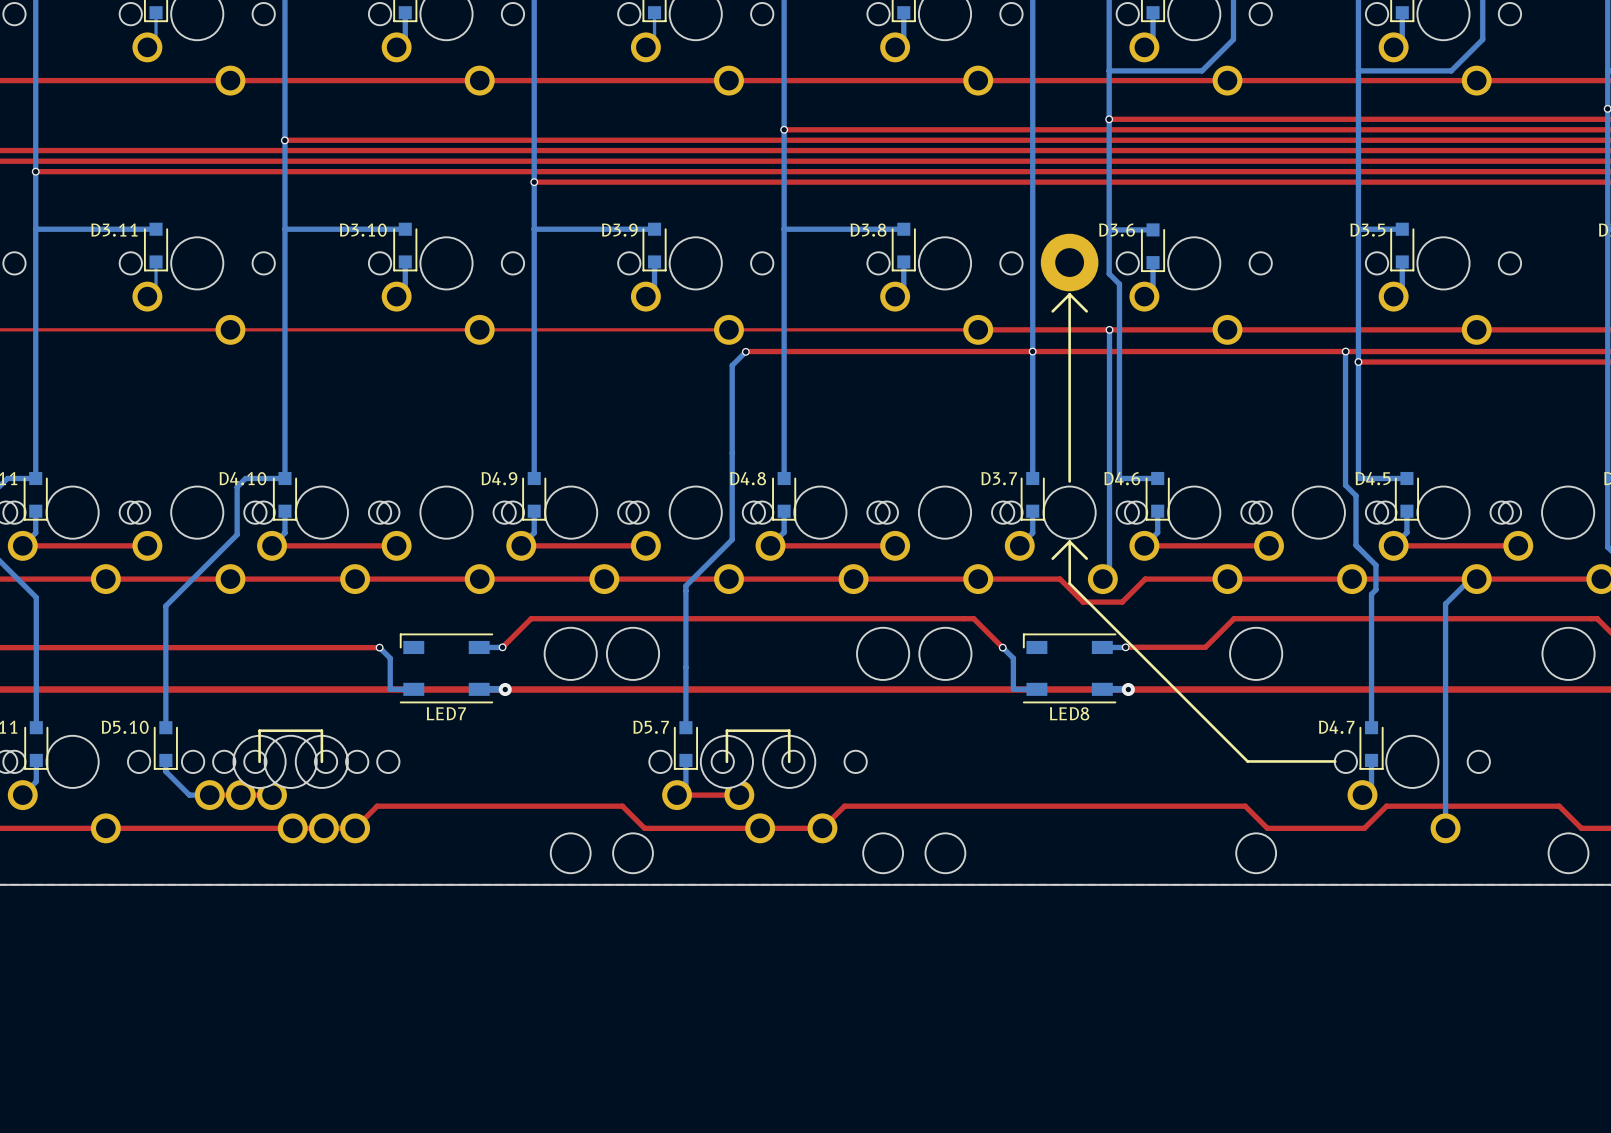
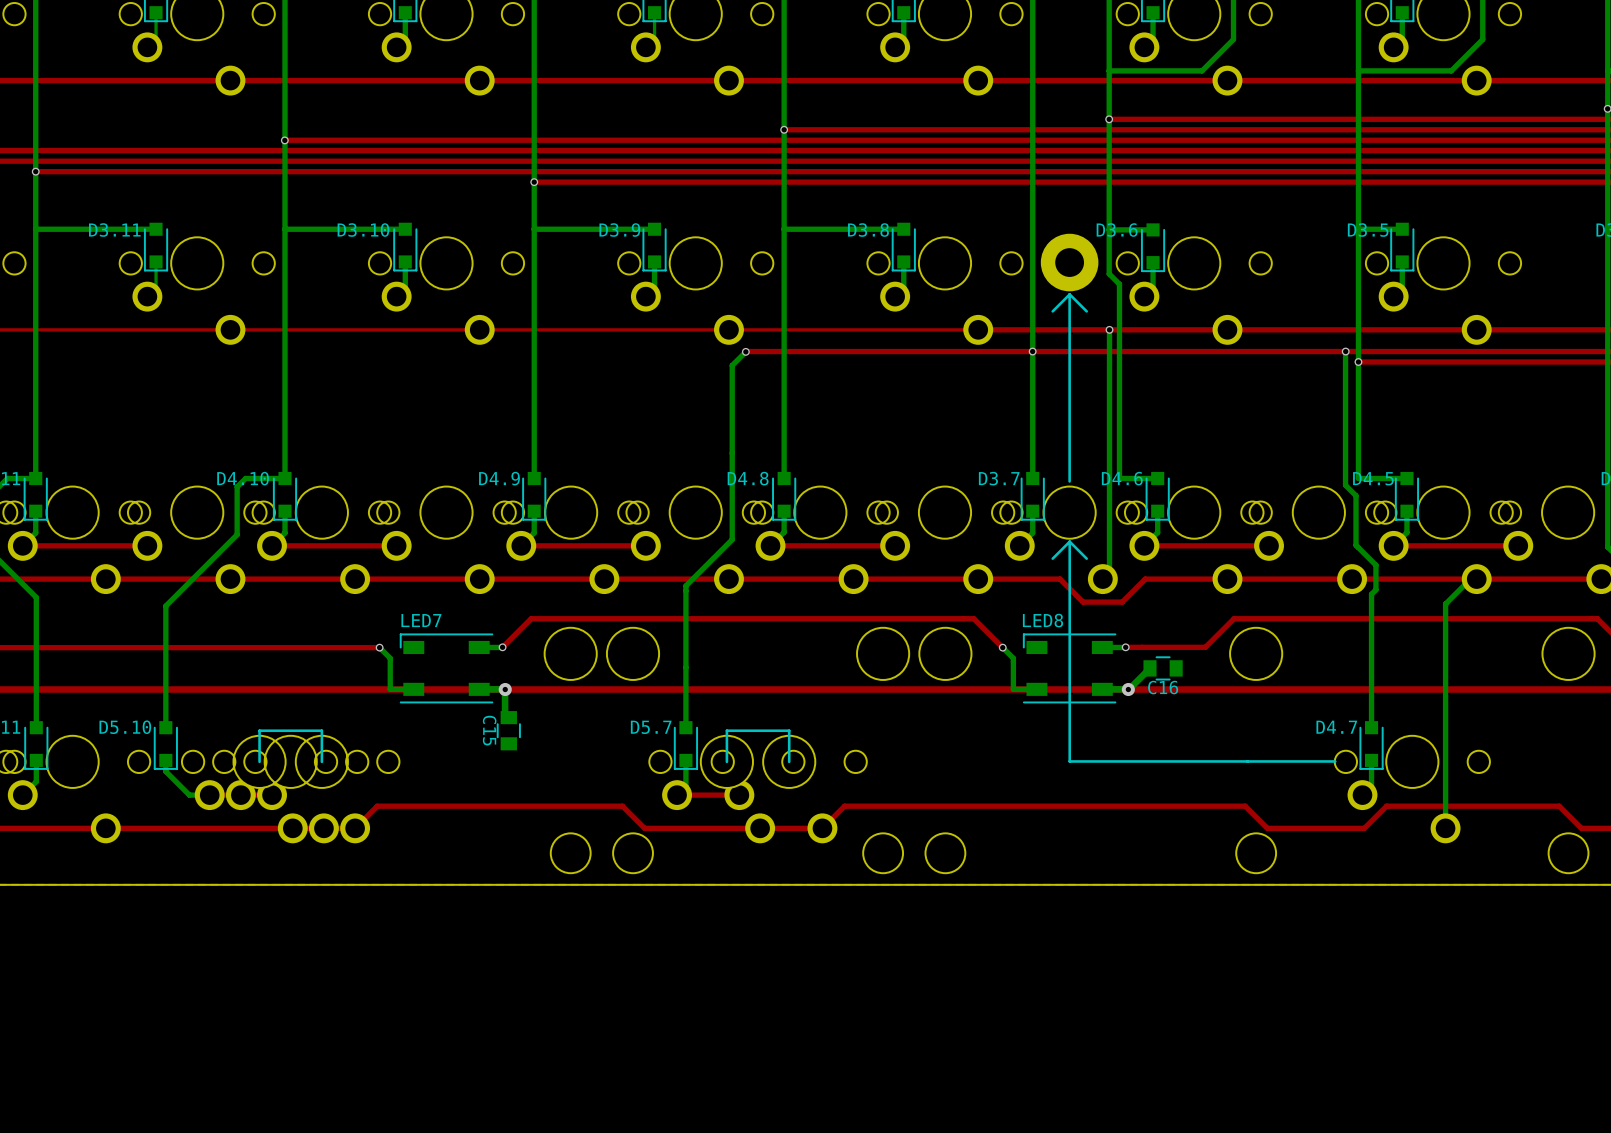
line: (1069, 583) (1247, 761) -> (1069, 583) (1069, 761) (1247, 761)
bottom track: none -> (1150, 668) (1128, 689)
C16: none -> (1163, 668)
bottom track: none -> (505, 689) (505, 713) (508, 717)
LED7 name position: LED7 (446, 713) -> LED7 (421, 620)
LED8 name position: LED8 (1069, 713) -> LED8 (1042, 620)
C15: none -> (508, 730)

